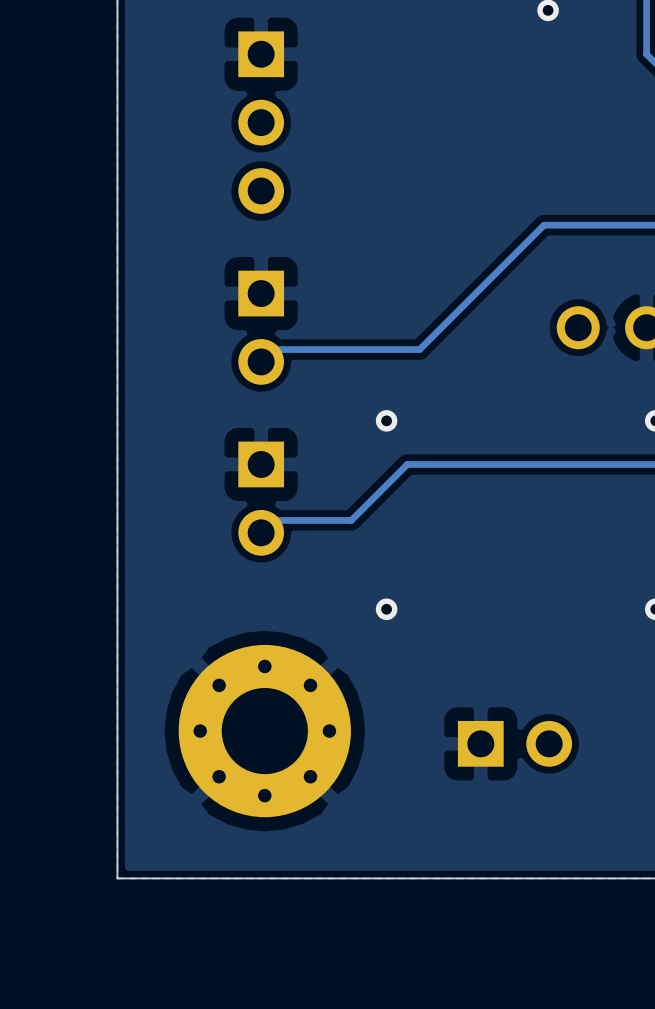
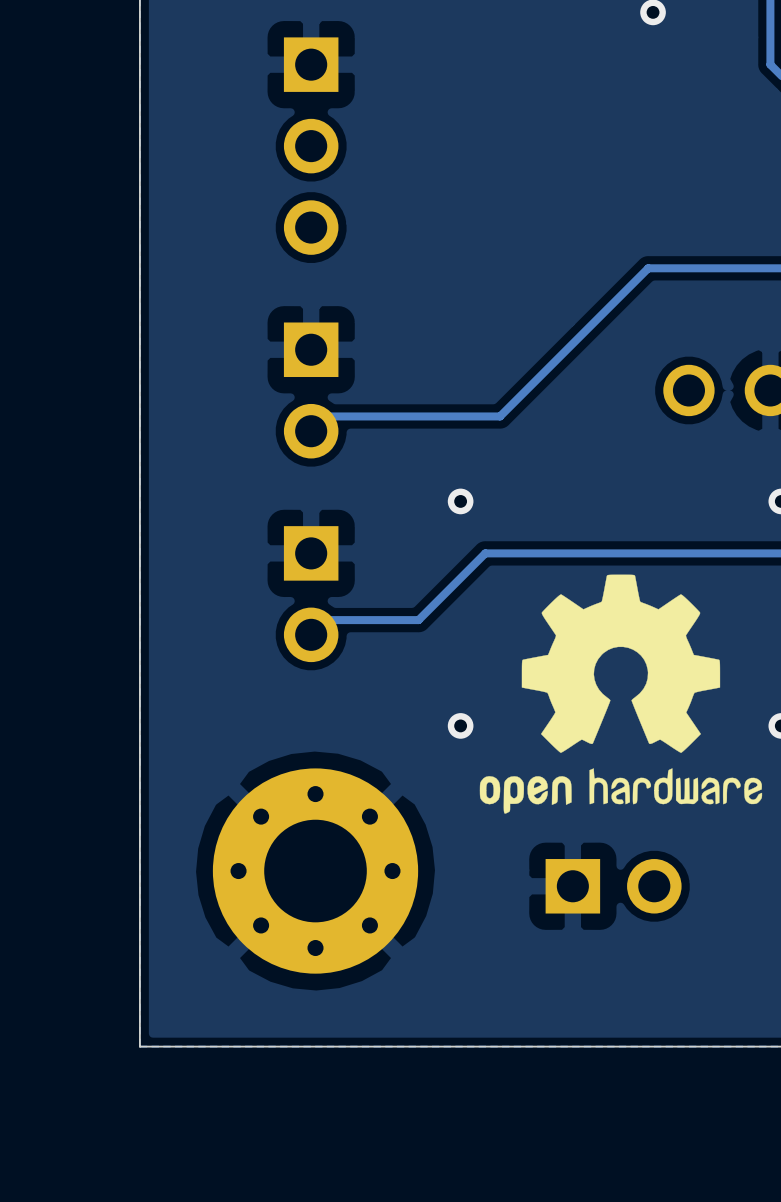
drawing: none -> [479, 574, 763, 814]

